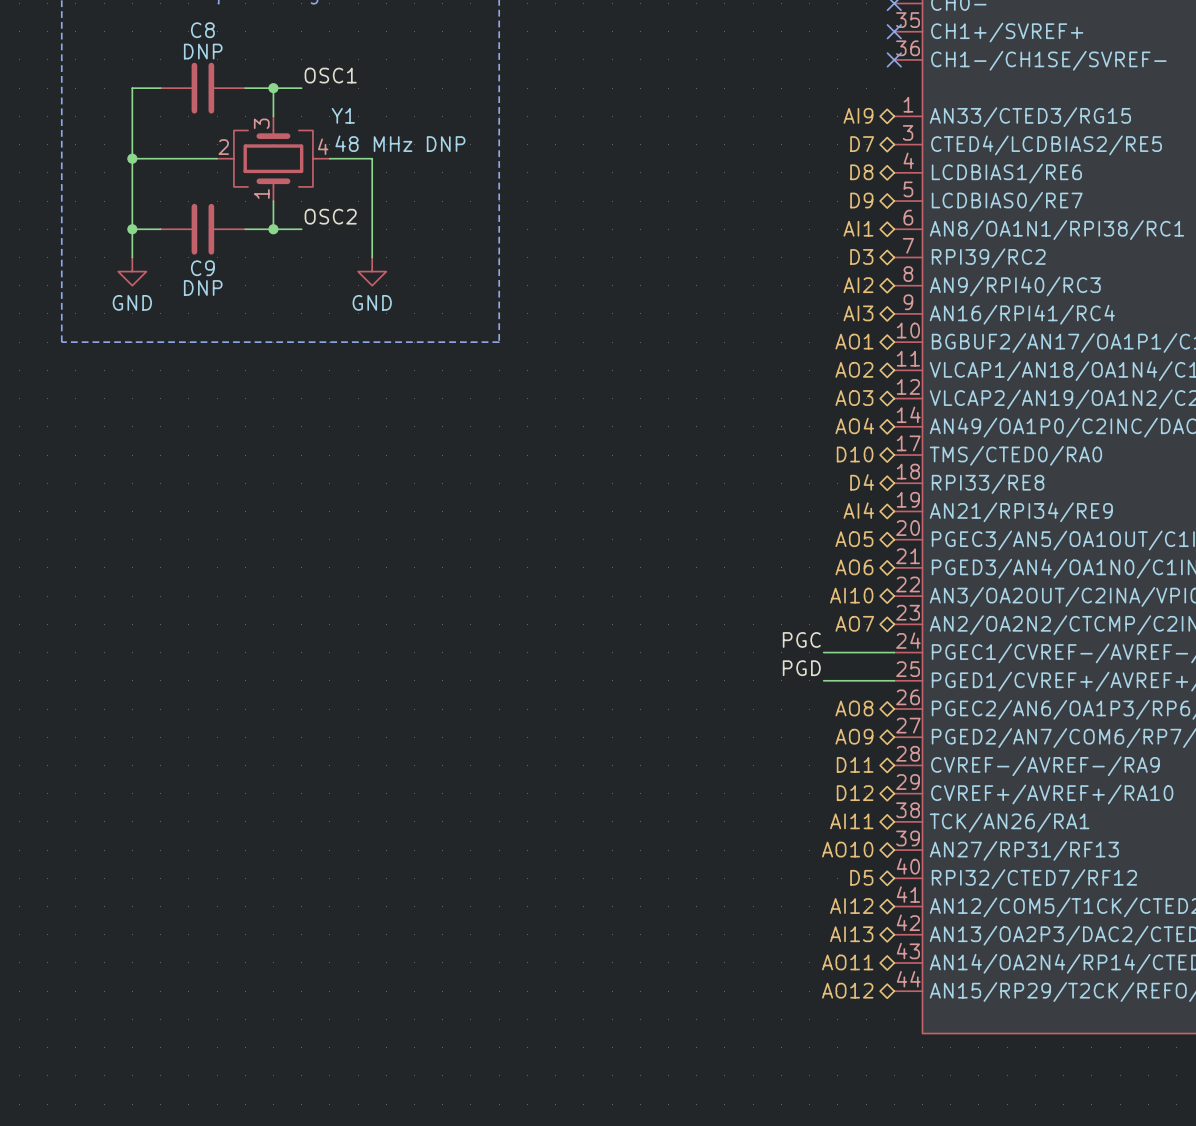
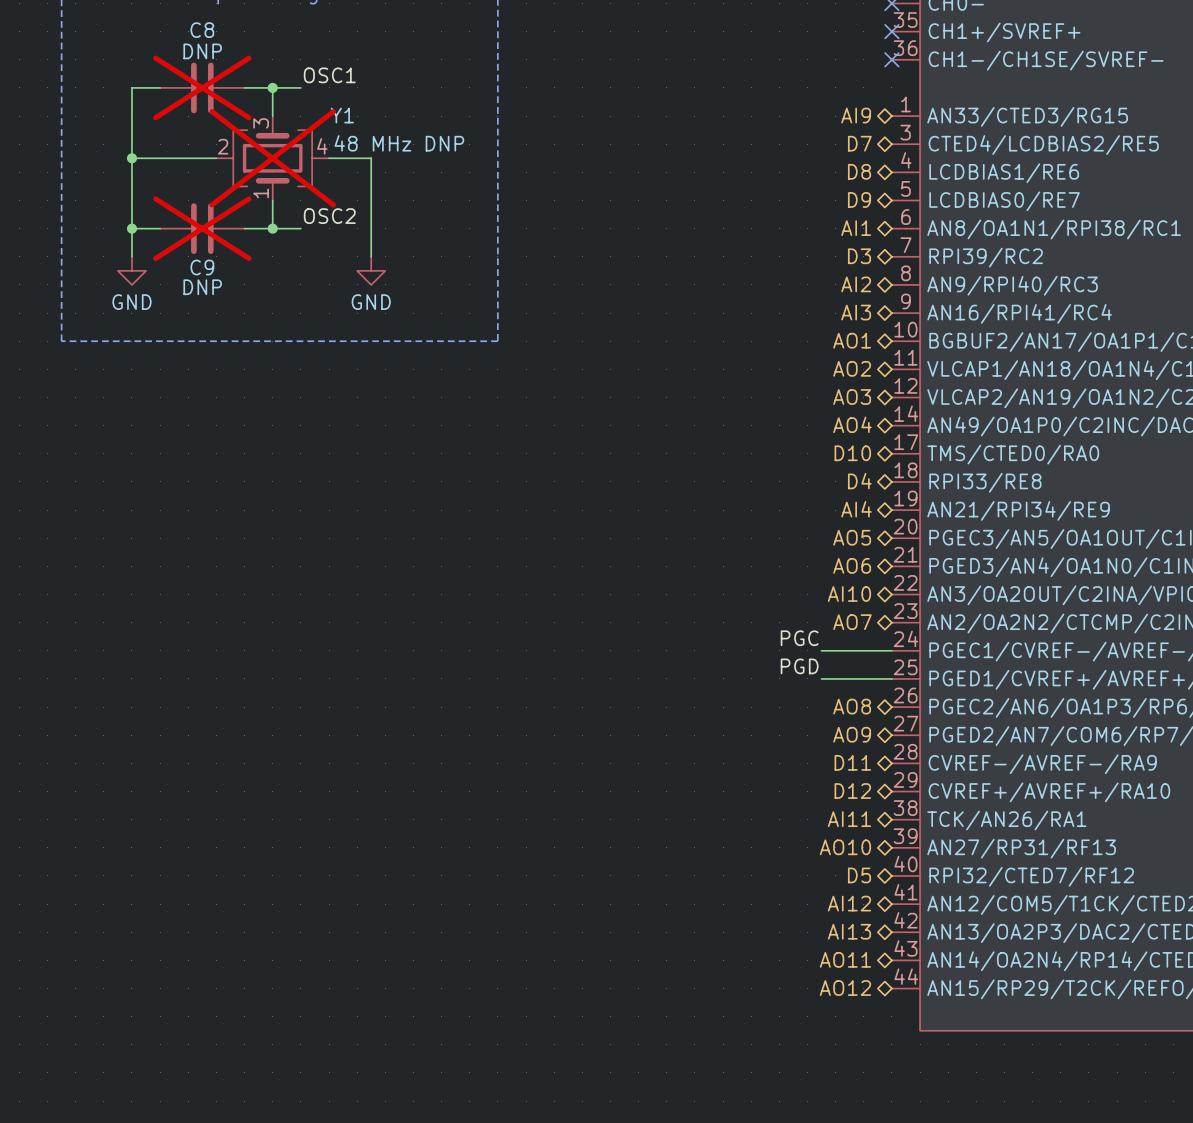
C8 do-not-place cross: none -> (202, 87)
Y1 do-not-place cross: none -> (272, 158)
C9 do-not-place cross: none -> (202, 228)

